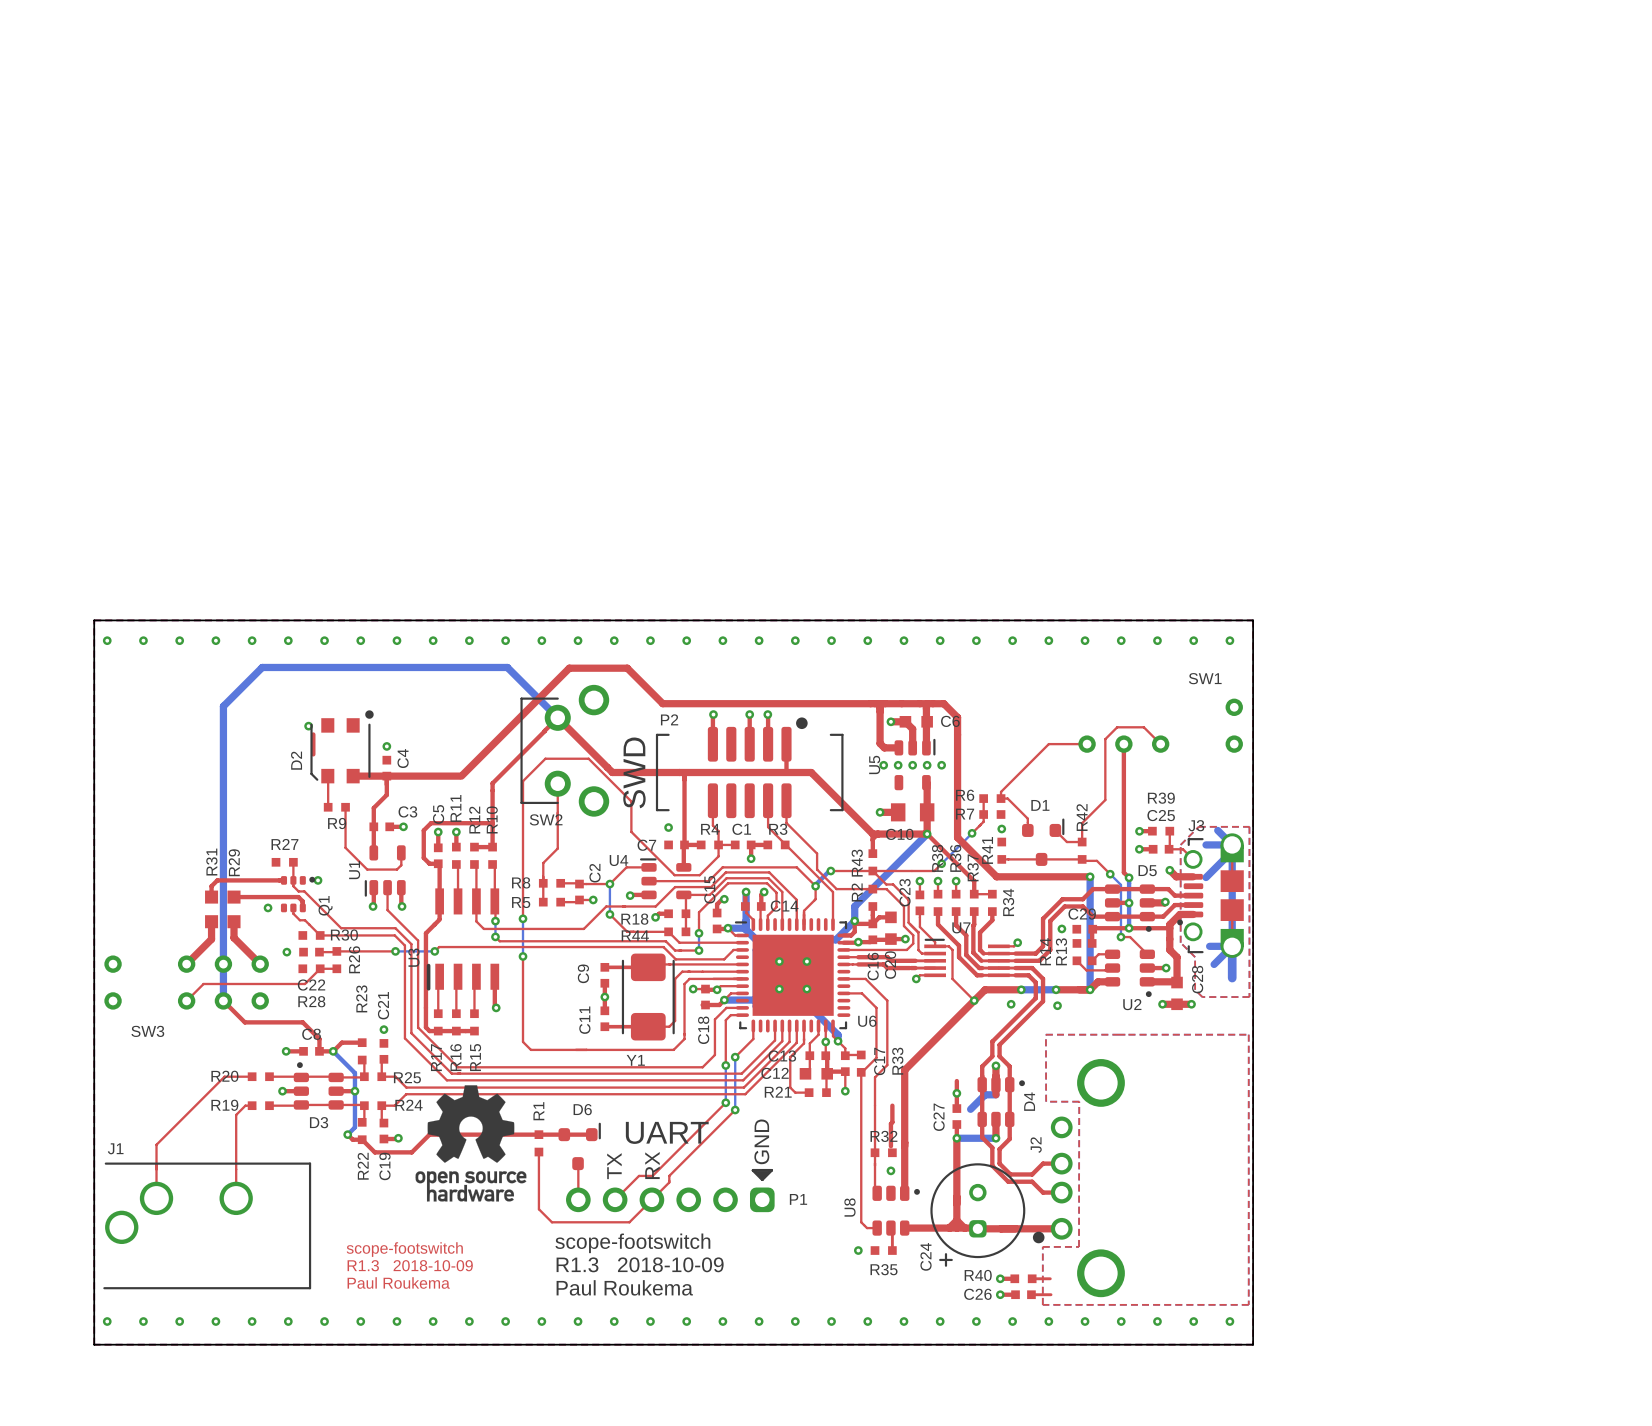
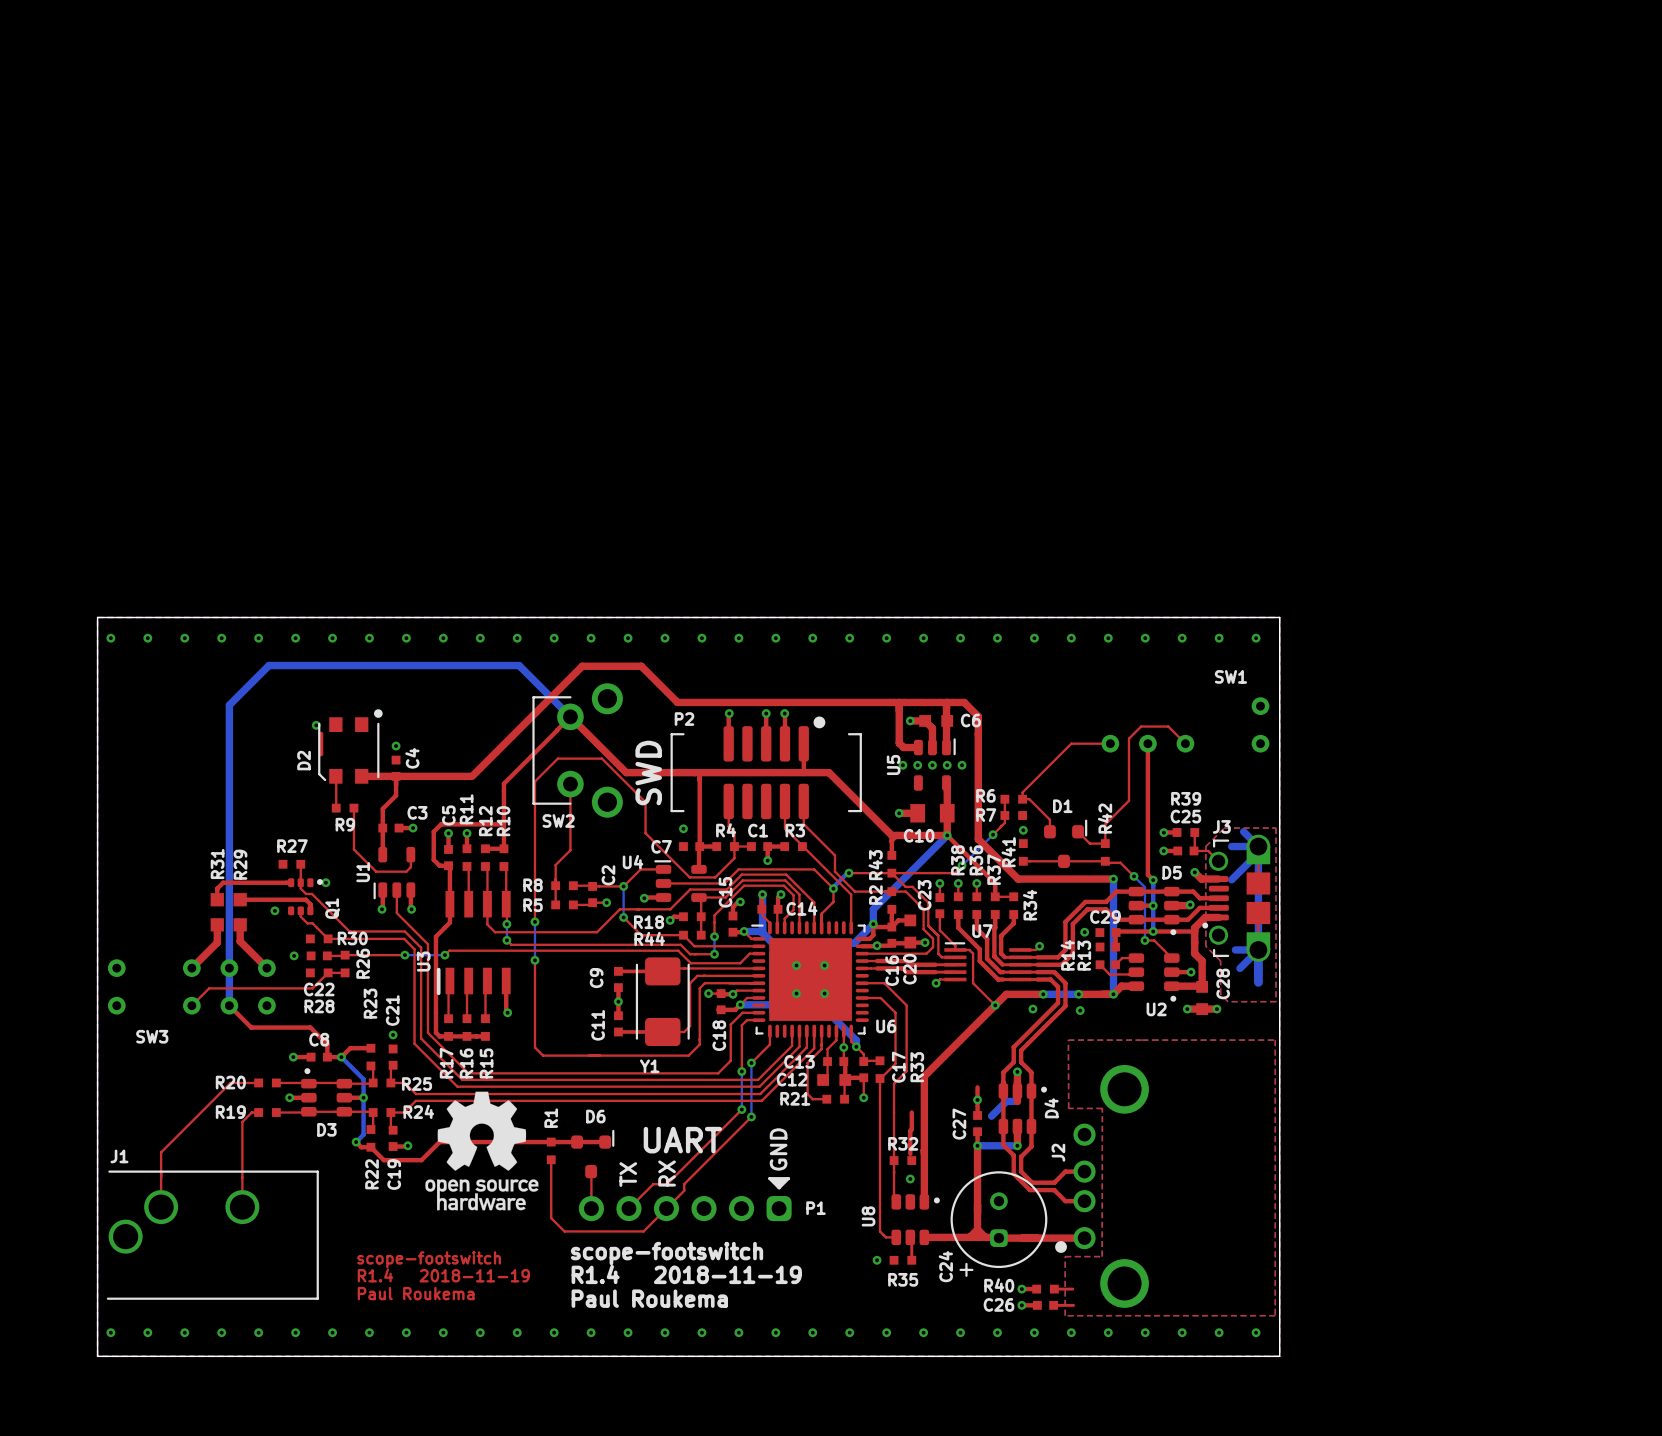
text: R1.3 2018-10-09 (640, 1264) -> R1.4 2018-11-19 (686, 1274)
text: R1.3 2018-10-09 (410, 1265) -> R1.4 2018-11-19 (443, 1275)

